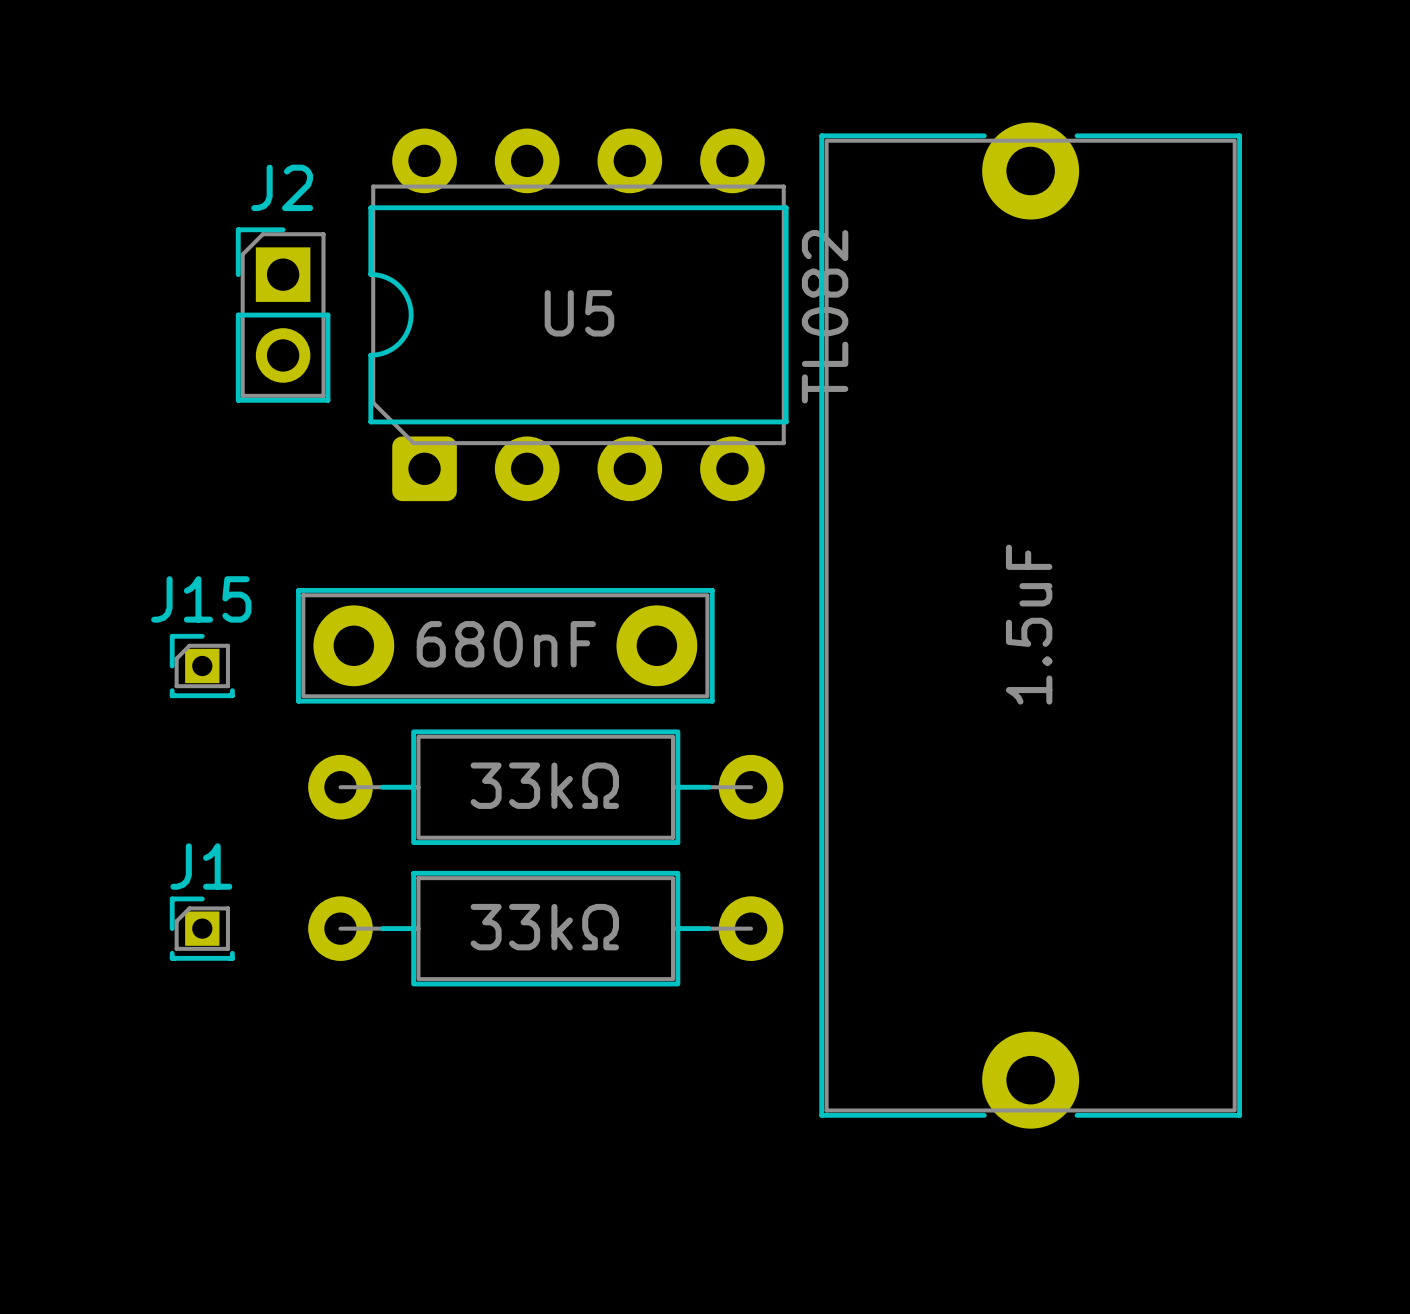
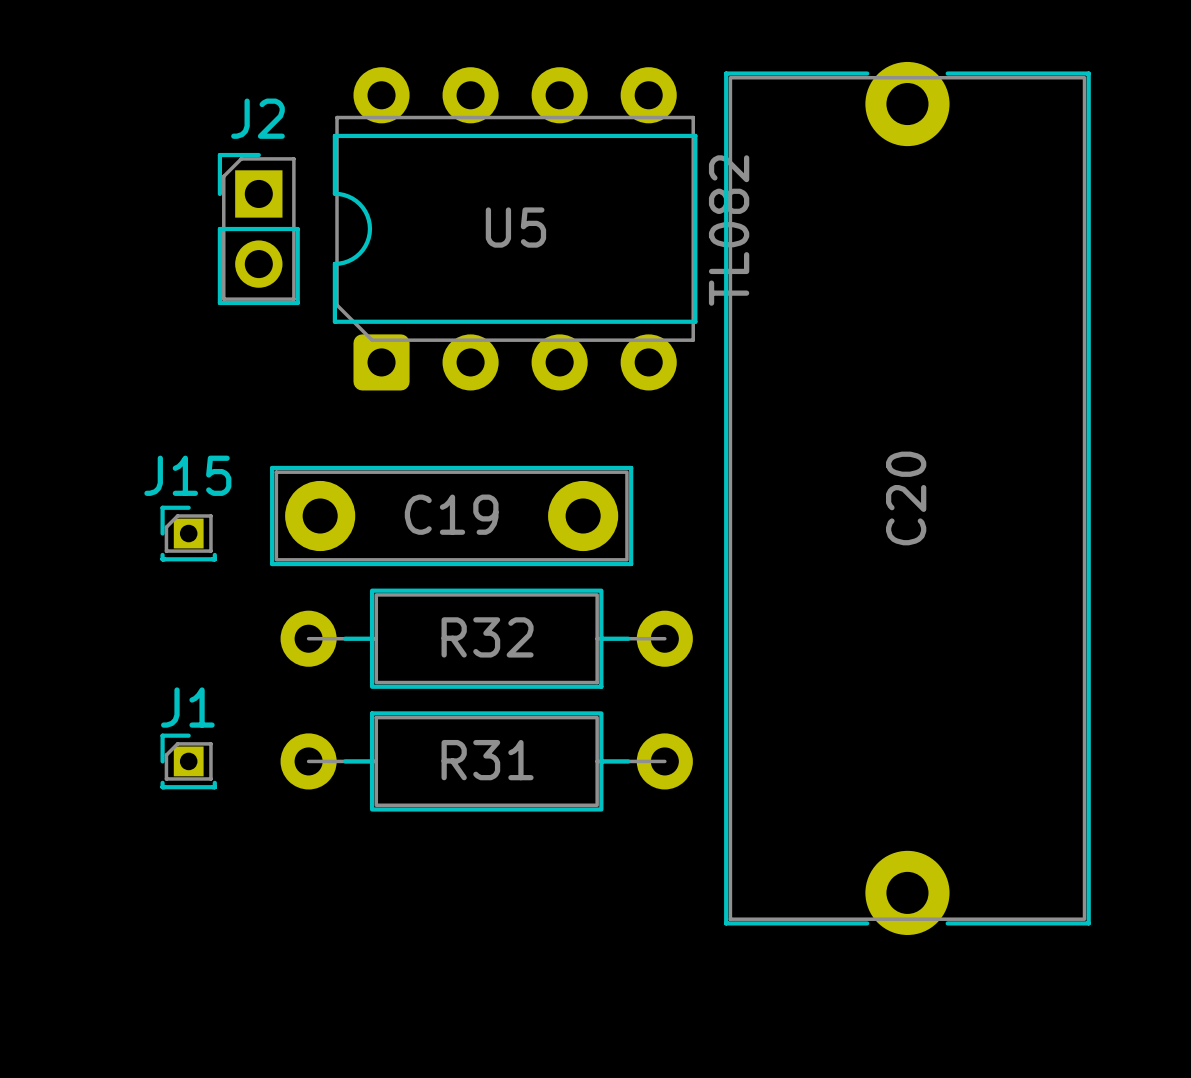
1.5uF name: 1.5uF (1029, 624) -> C20 (906, 498)
680nF name: 680nF (506, 644) -> C19 (451, 514)
33kΩ name: 33kΩ (544, 785) -> R32 (487, 637)
33kΩ name: 33kΩ (544, 927) -> R31 (487, 760)

